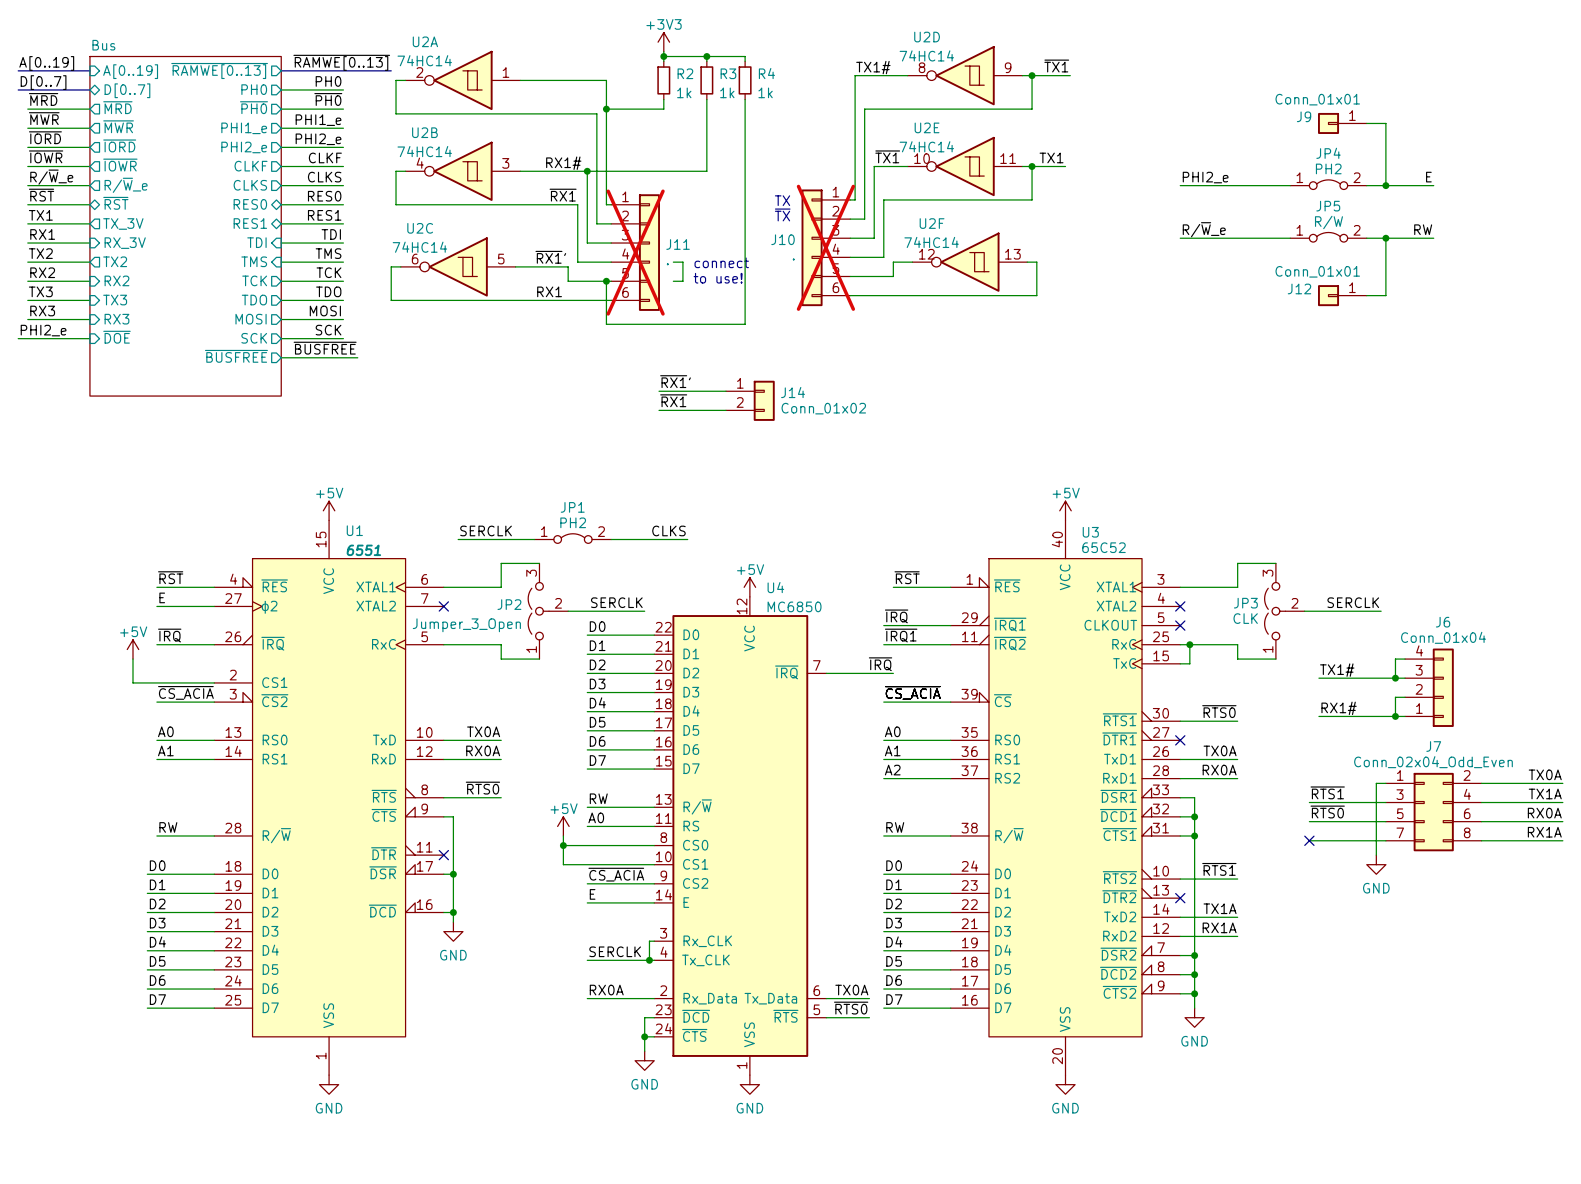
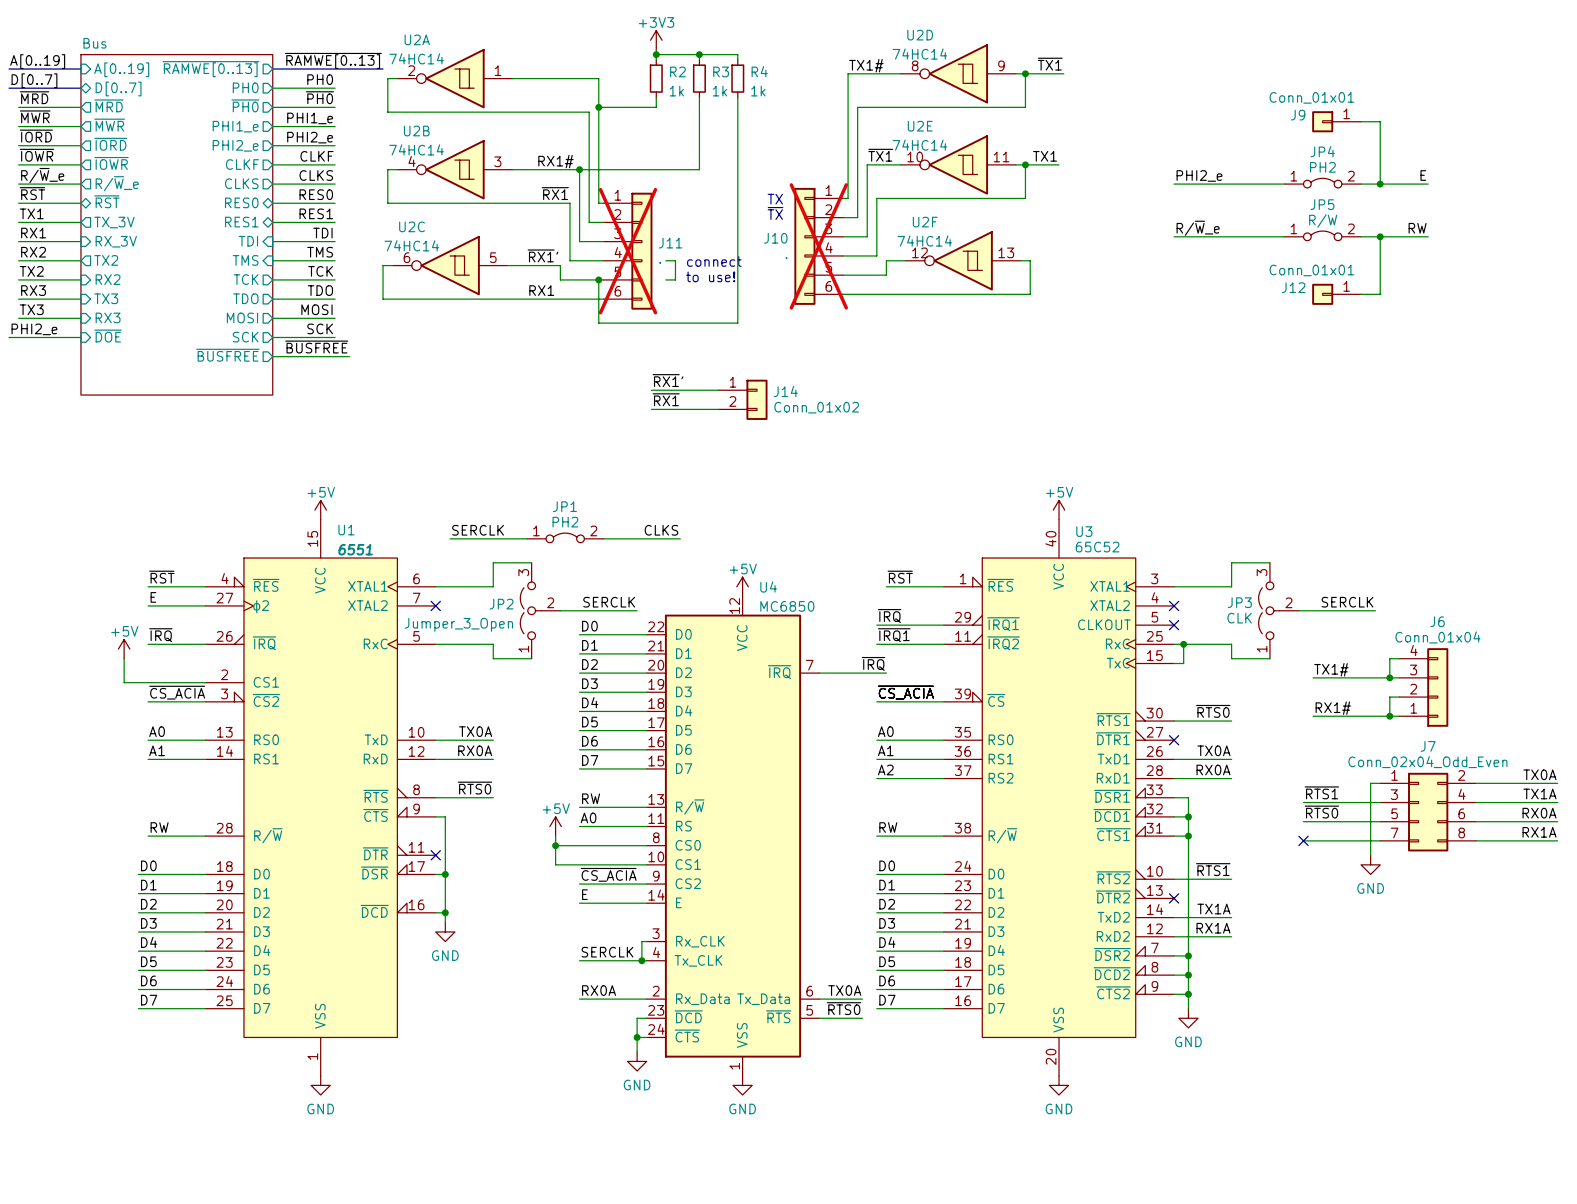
label: TX2 (40, 253) -> RX2 (33, 252)
label: RX2 (42, 272) -> TX2 (31, 271)
label: TX3 (40, 291) -> RX3 (33, 290)
label: RX3 (42, 310) -> TX3 (31, 309)

